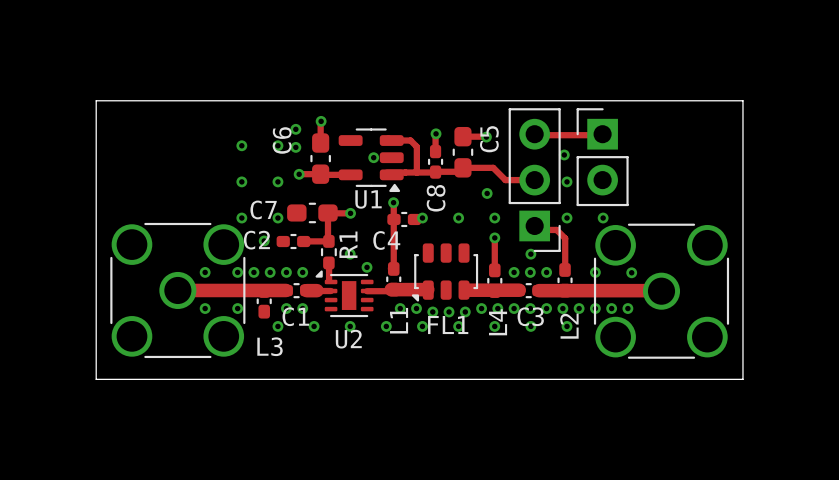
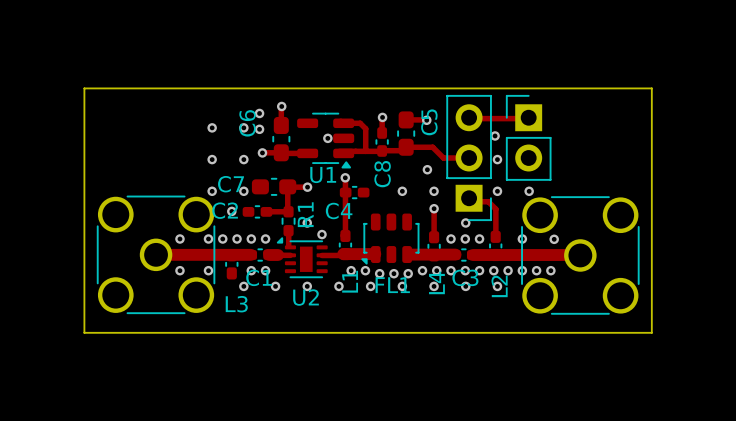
via: (422, 218) -> none

